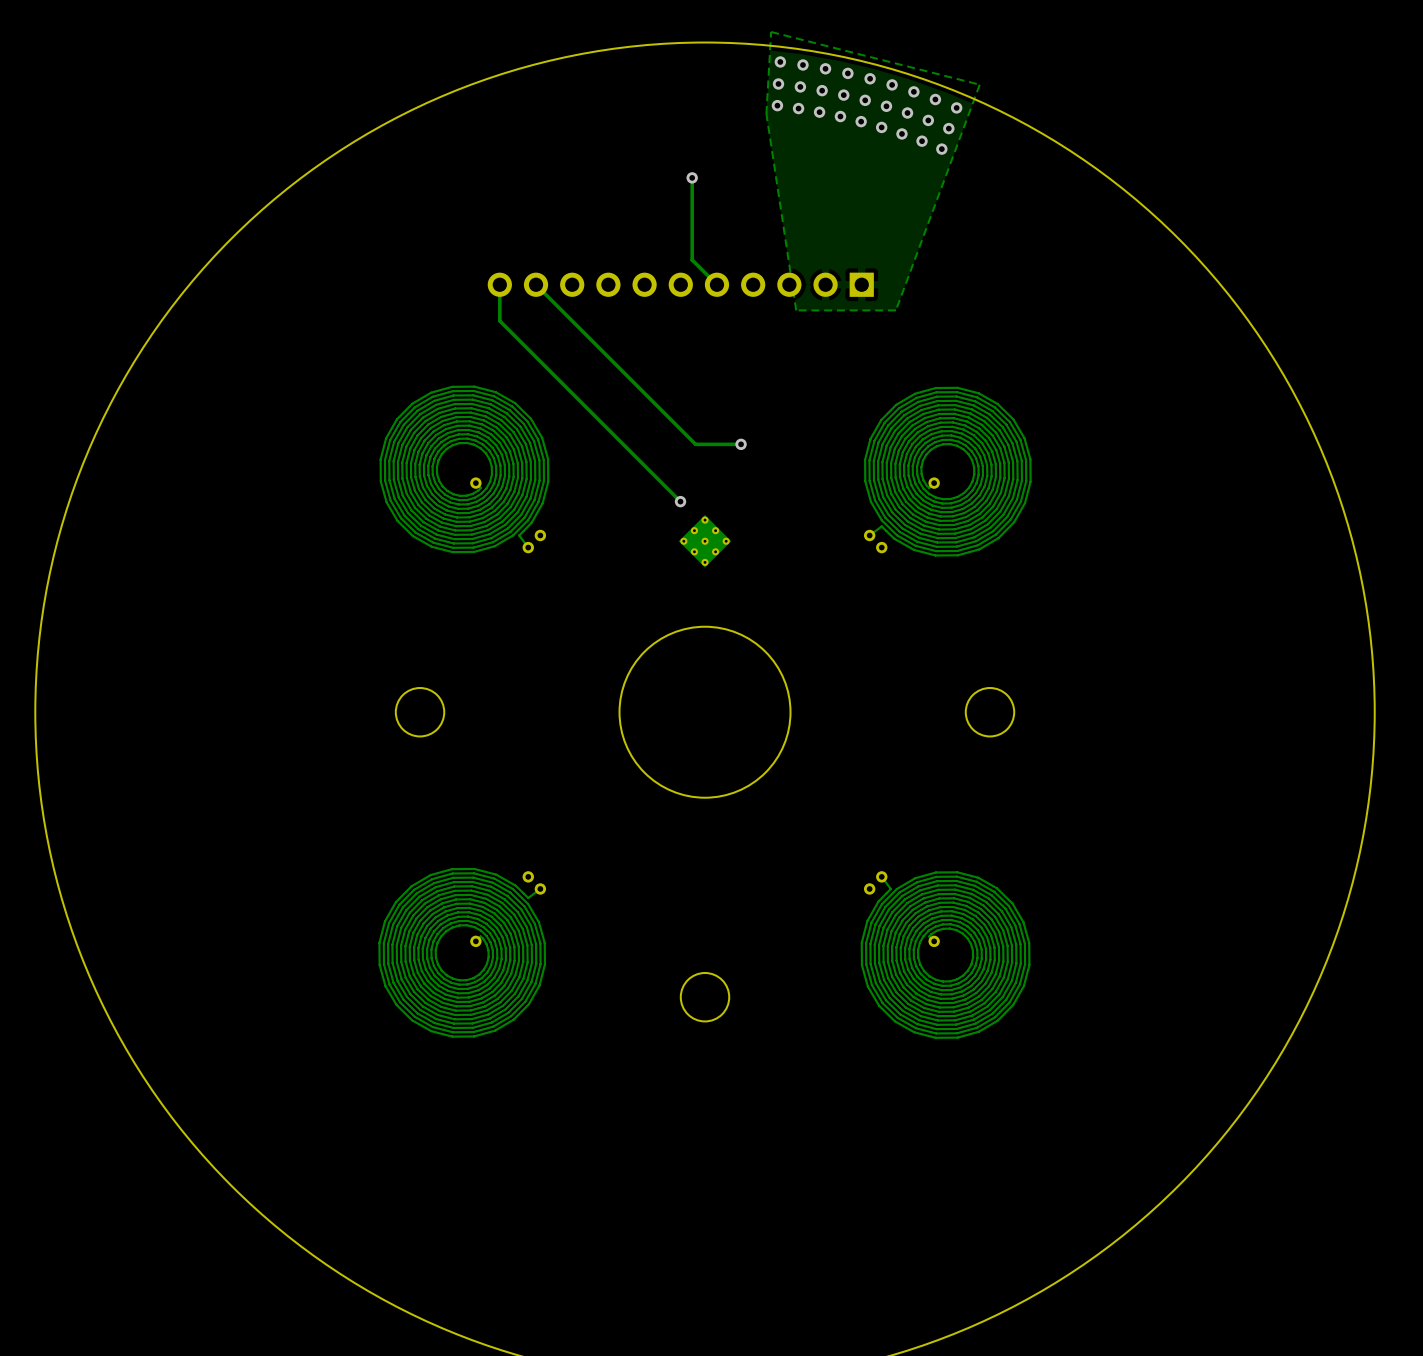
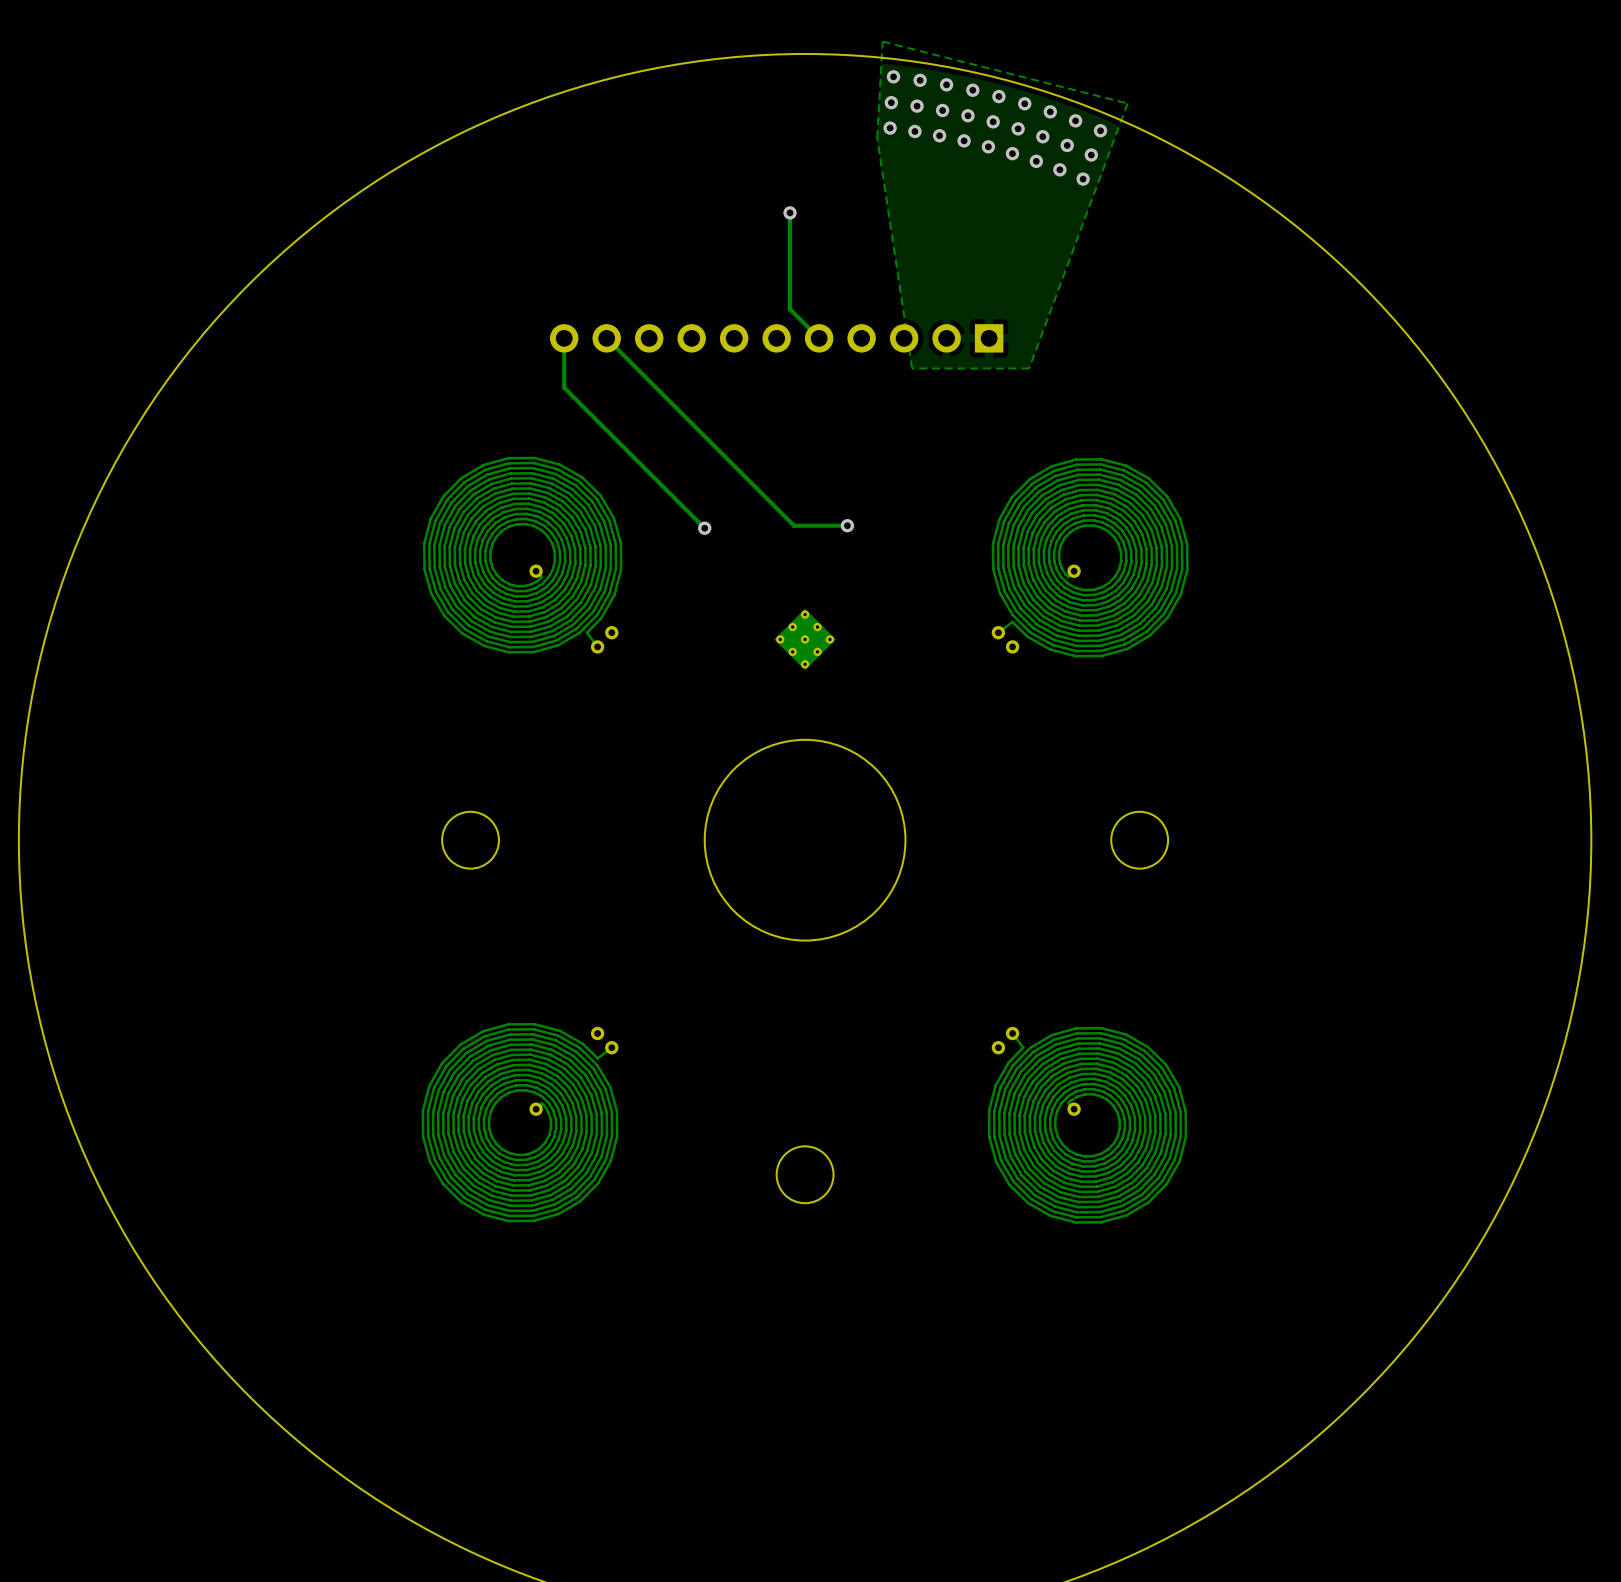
track: (499, 320) (680, 501) -> (564, 380) (564, 387) (704, 528)
via position: (680, 501) -> (704, 528)

